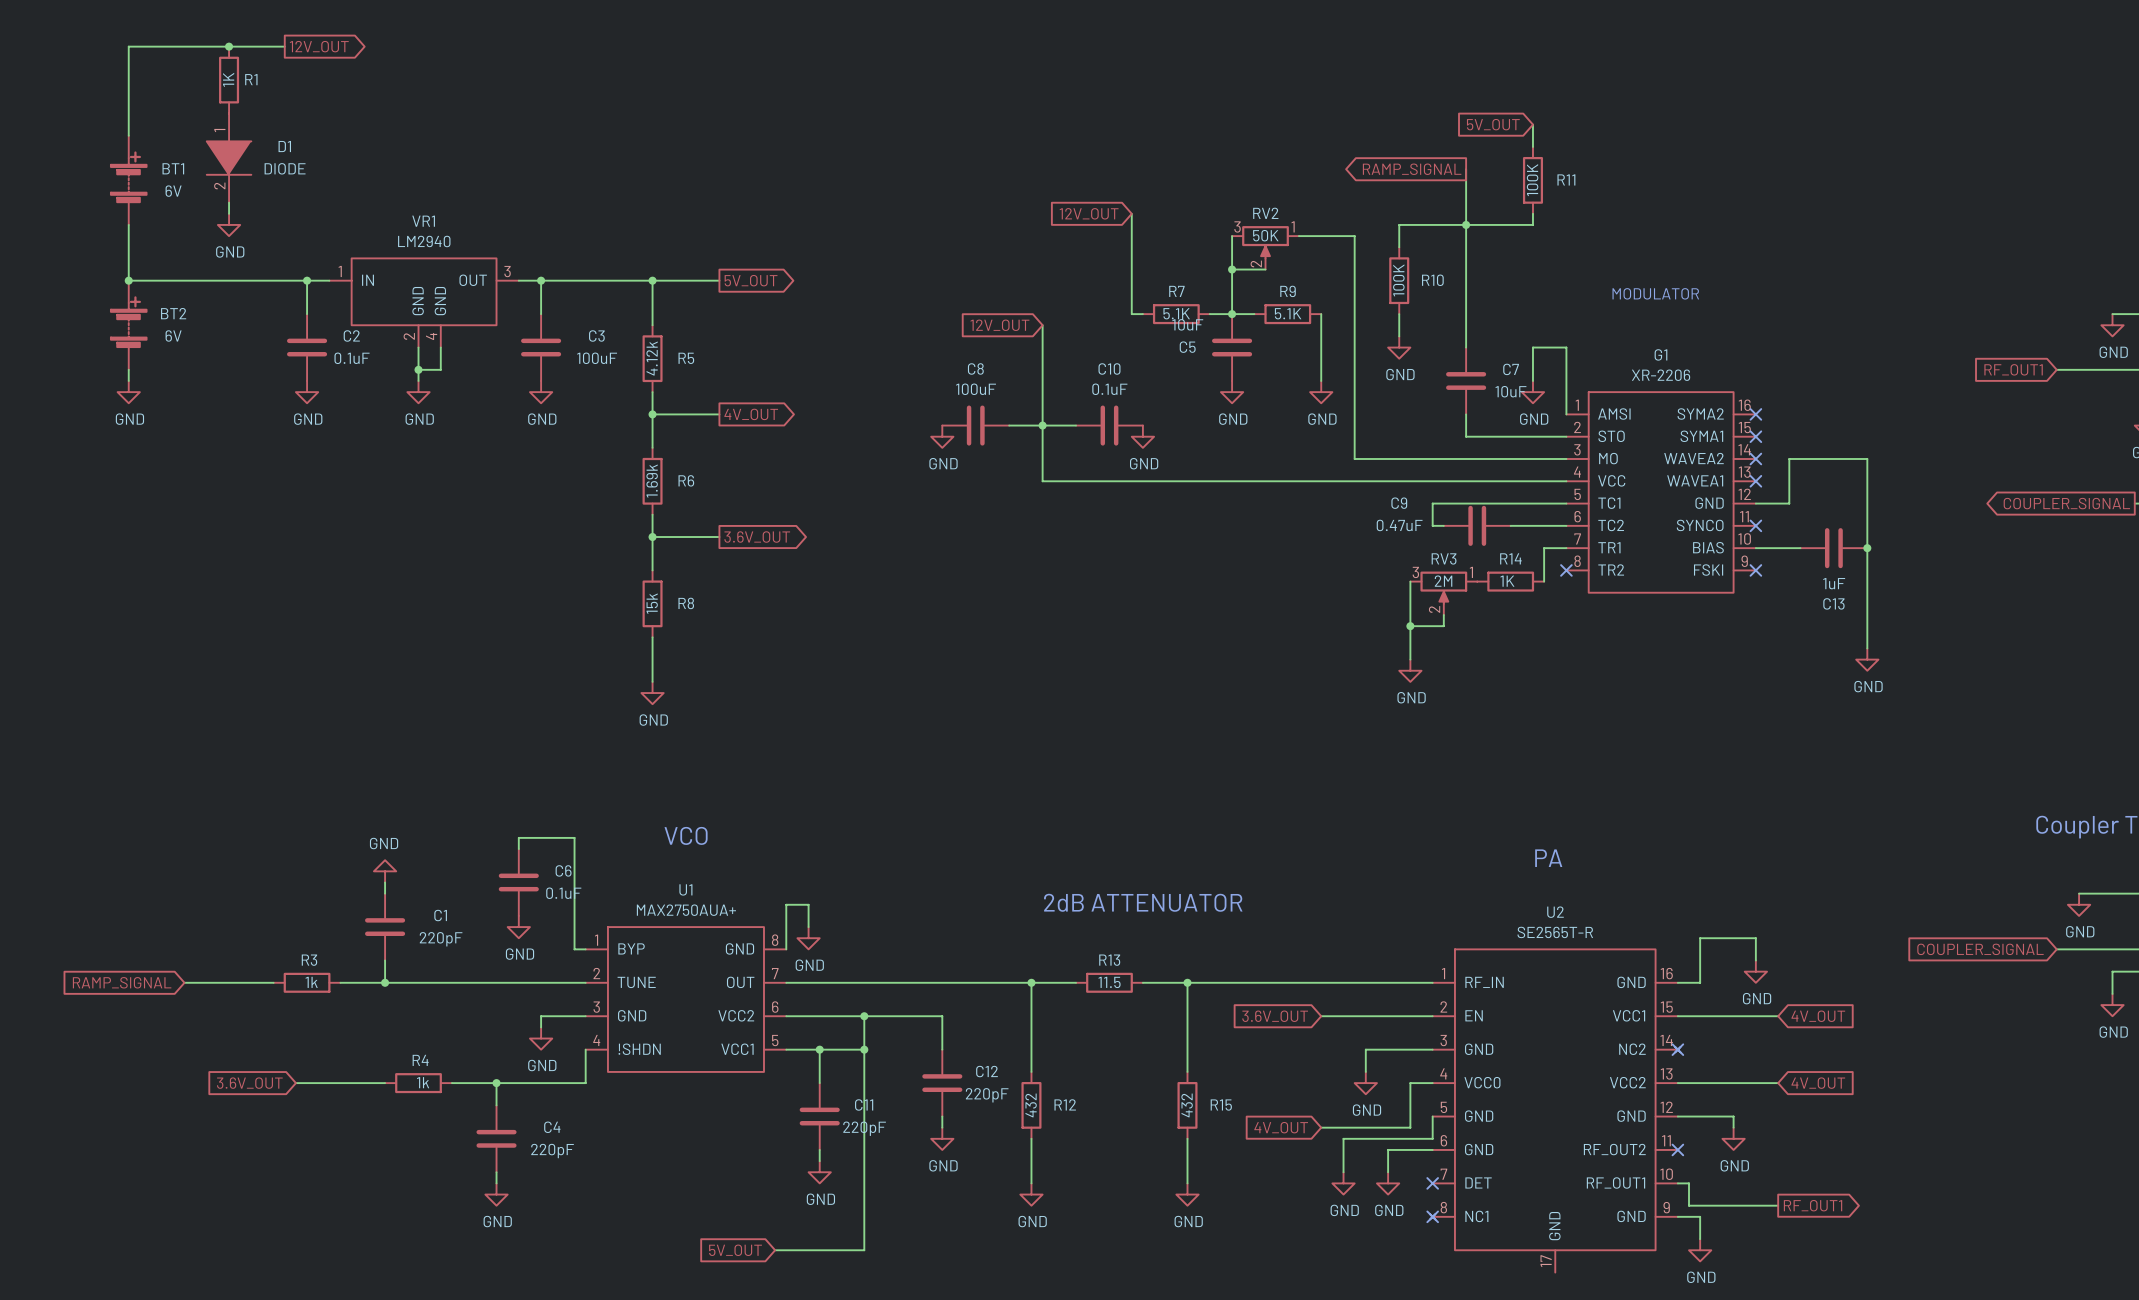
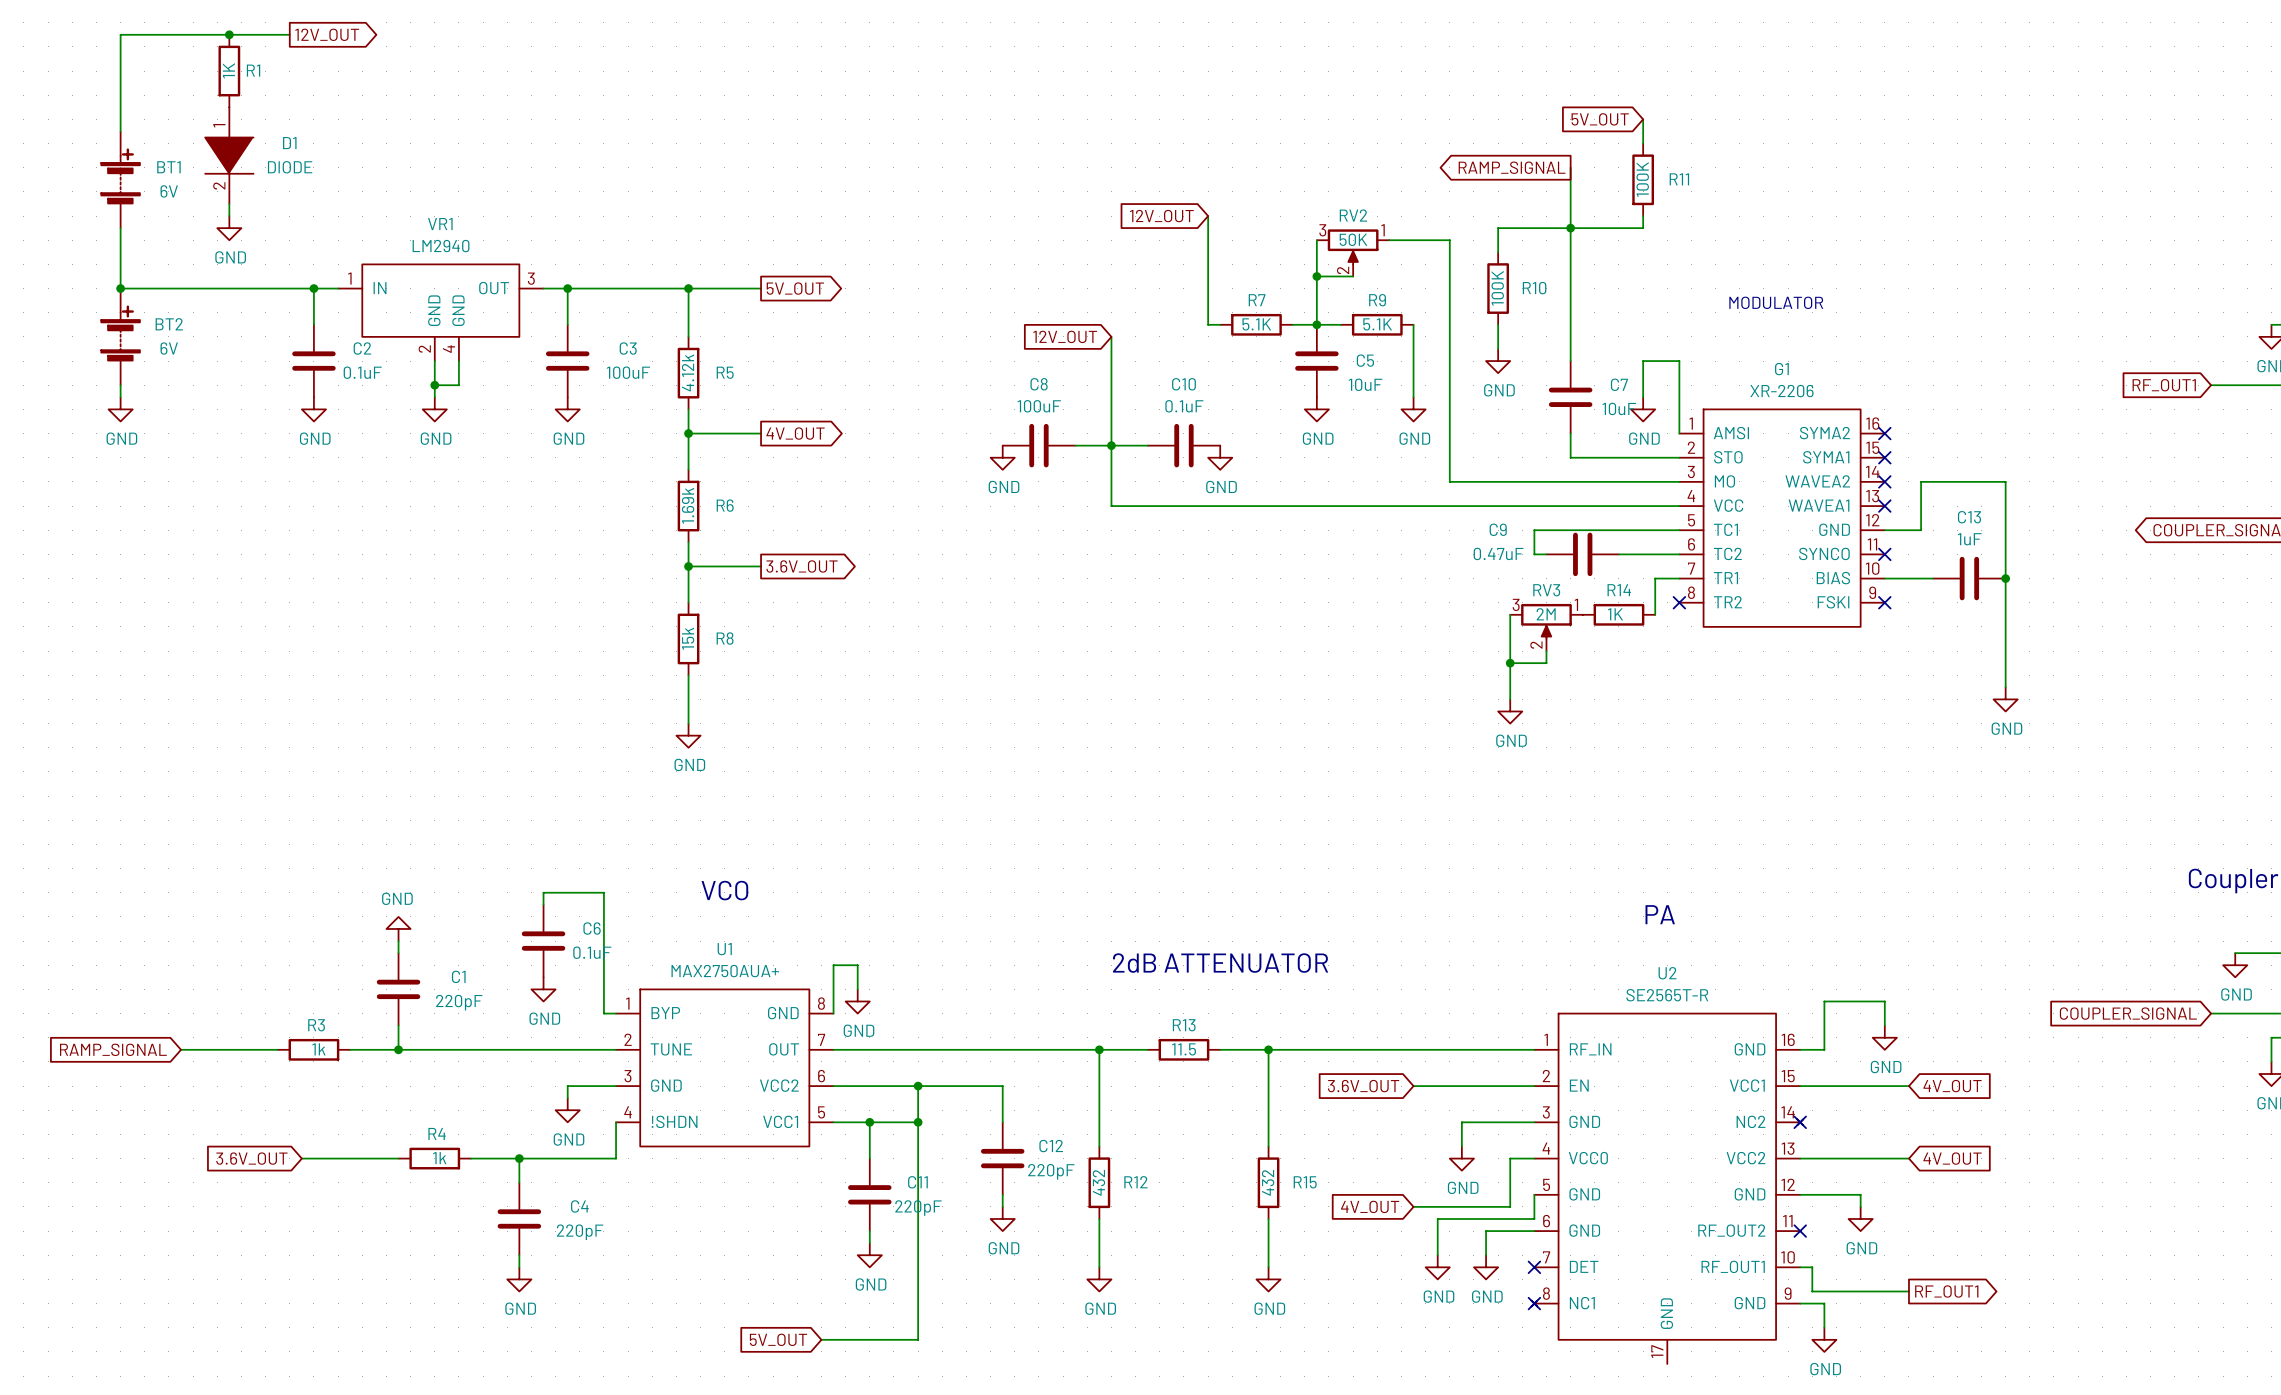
C5 value position: 10uF (1187, 324) -> 10uF (1365, 384)
C5 name position: C5 (1187, 347) -> C5 (1365, 360)
C13 value position: 1uF (1834, 583) -> 1uF (1969, 539)
C13 name position: C13 (1833, 603) -> C13 (1969, 517)

